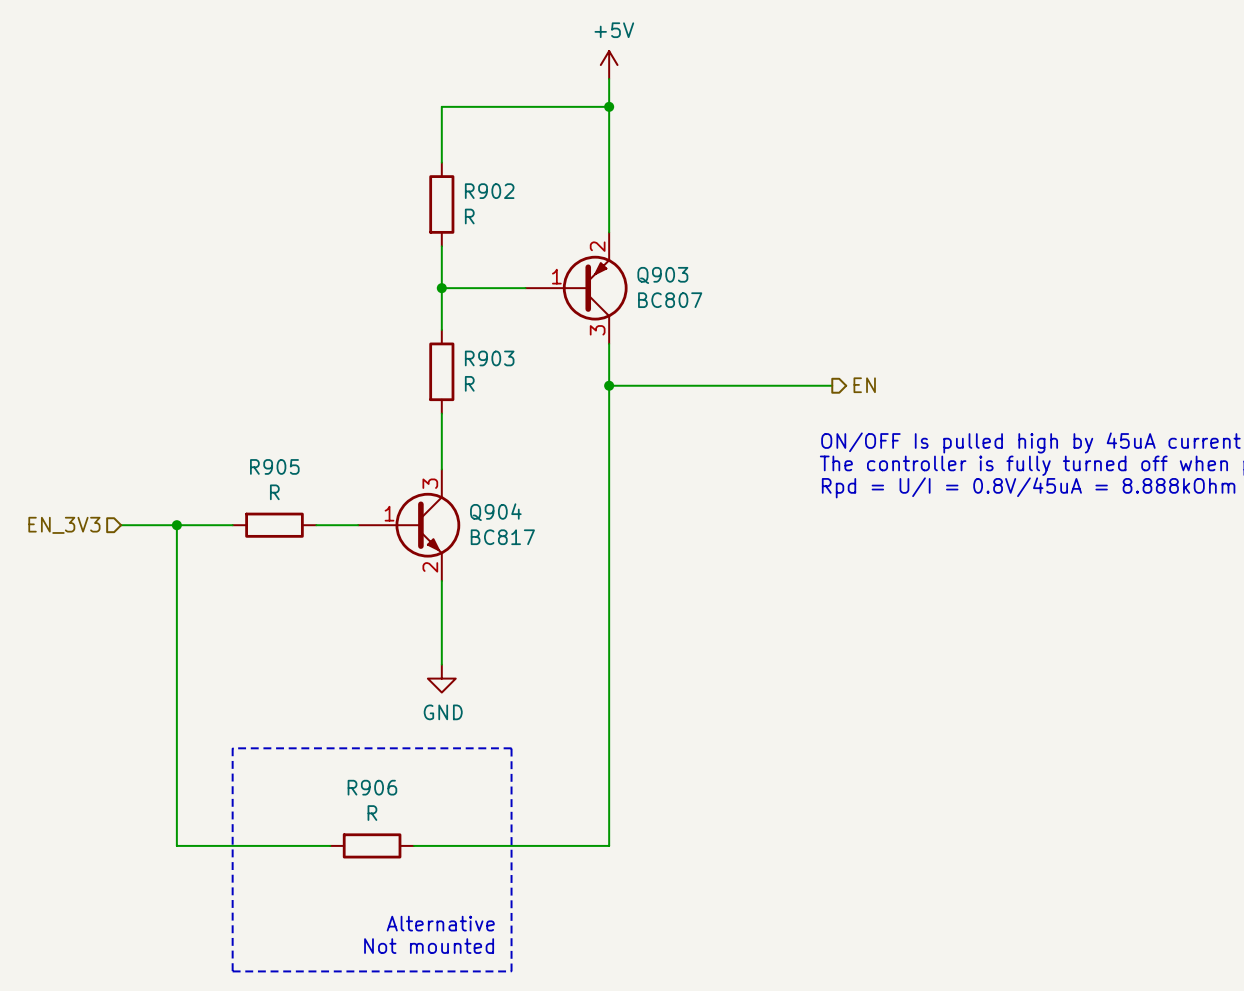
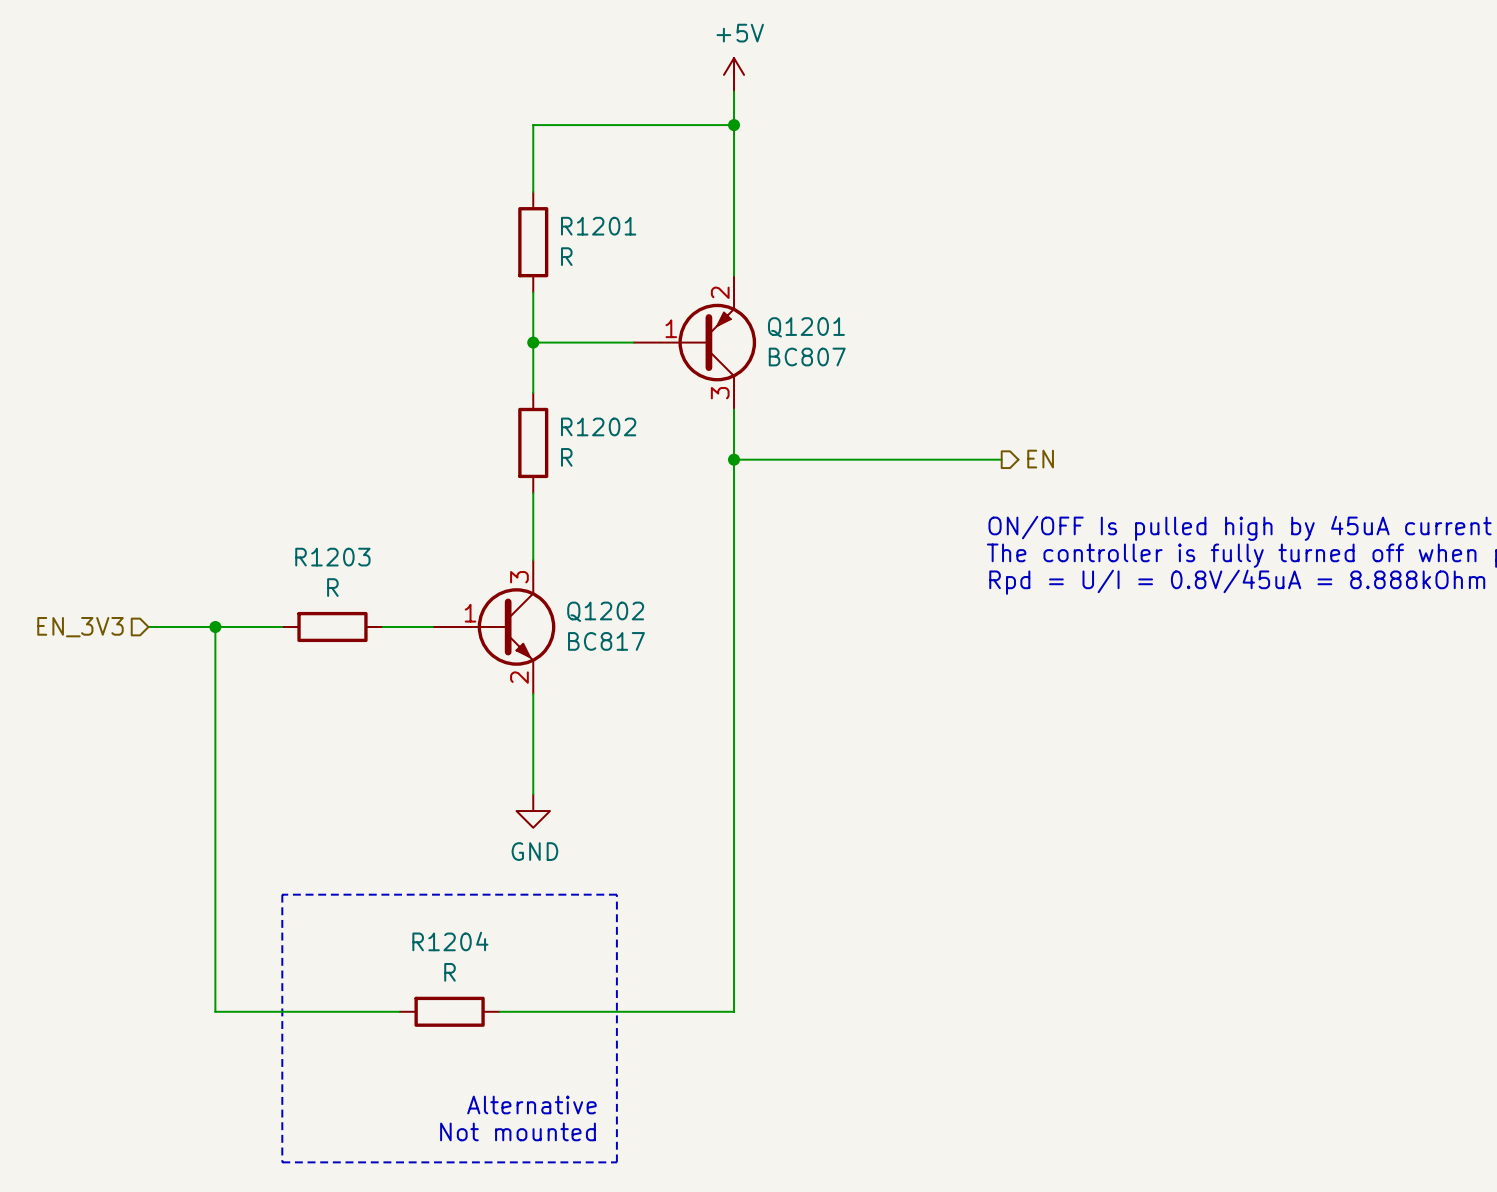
R902 name: R902 (489, 191) -> R1201 (598, 226)
Q903 name: Q903 (662, 275) -> Q1201 (806, 327)
R903 name: R903 (489, 358) -> R1202 (598, 426)
R905 name: R905 (274, 466) -> R1203 (332, 557)
Q904 name: Q904 (495, 512) -> Q1202 (605, 611)
R906 name: R906 (372, 787) -> R1204 (450, 941)

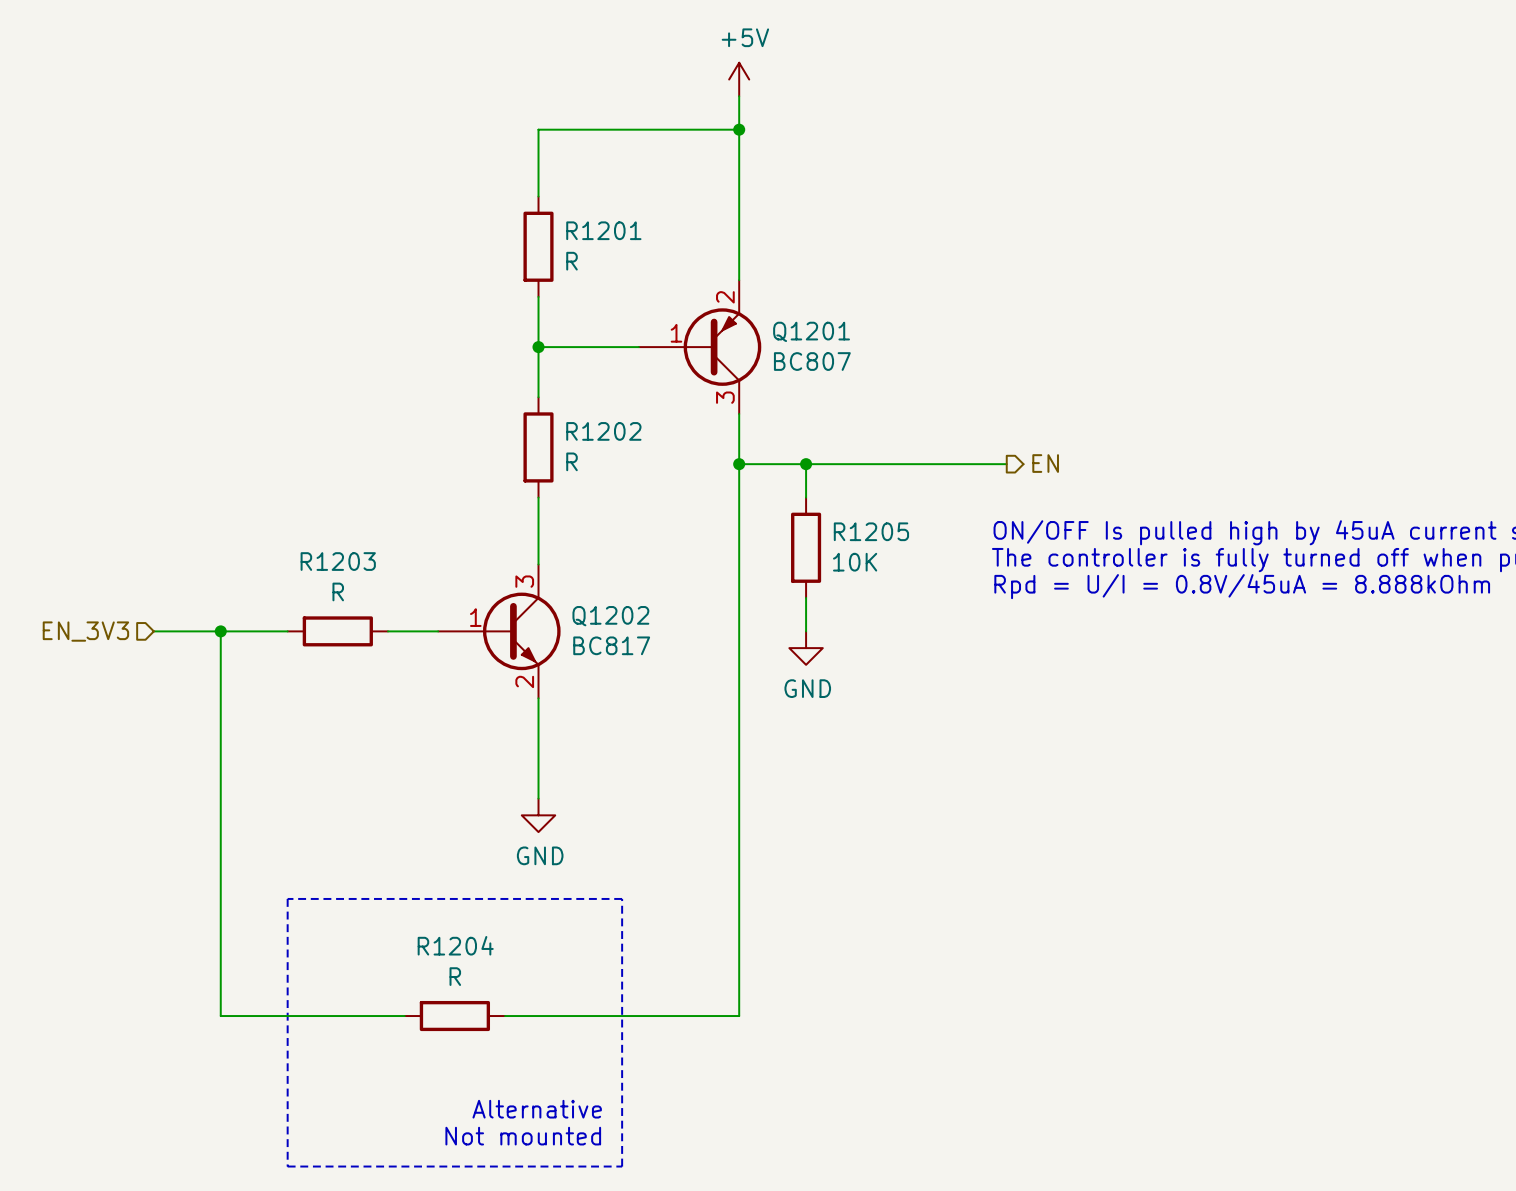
wire: none -> (806, 464) (806, 497)
junction: none -> (806, 464)
R1205: none -> 10K (806, 547)
wire: none -> (806, 597) (806, 631)
power symbol: none -> GND (806, 648)

